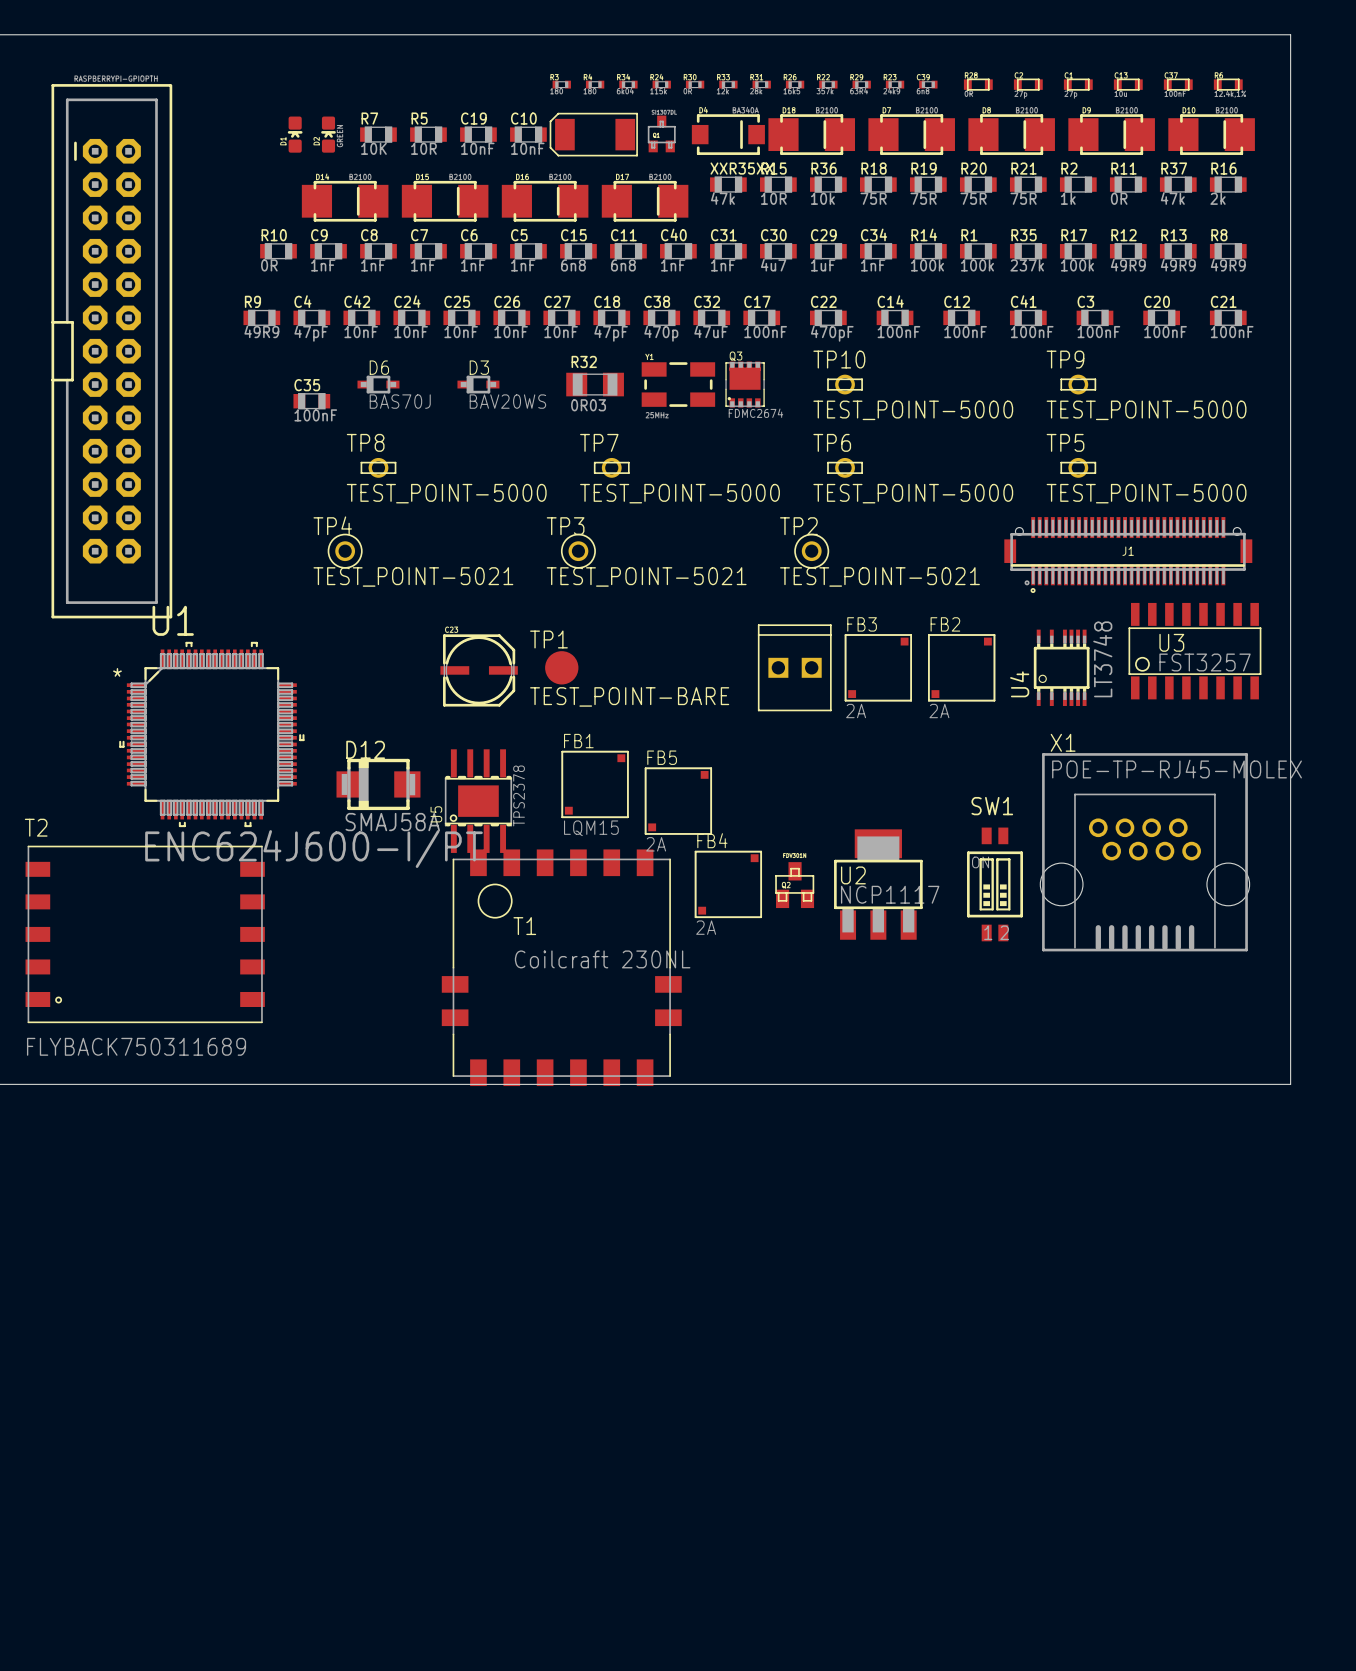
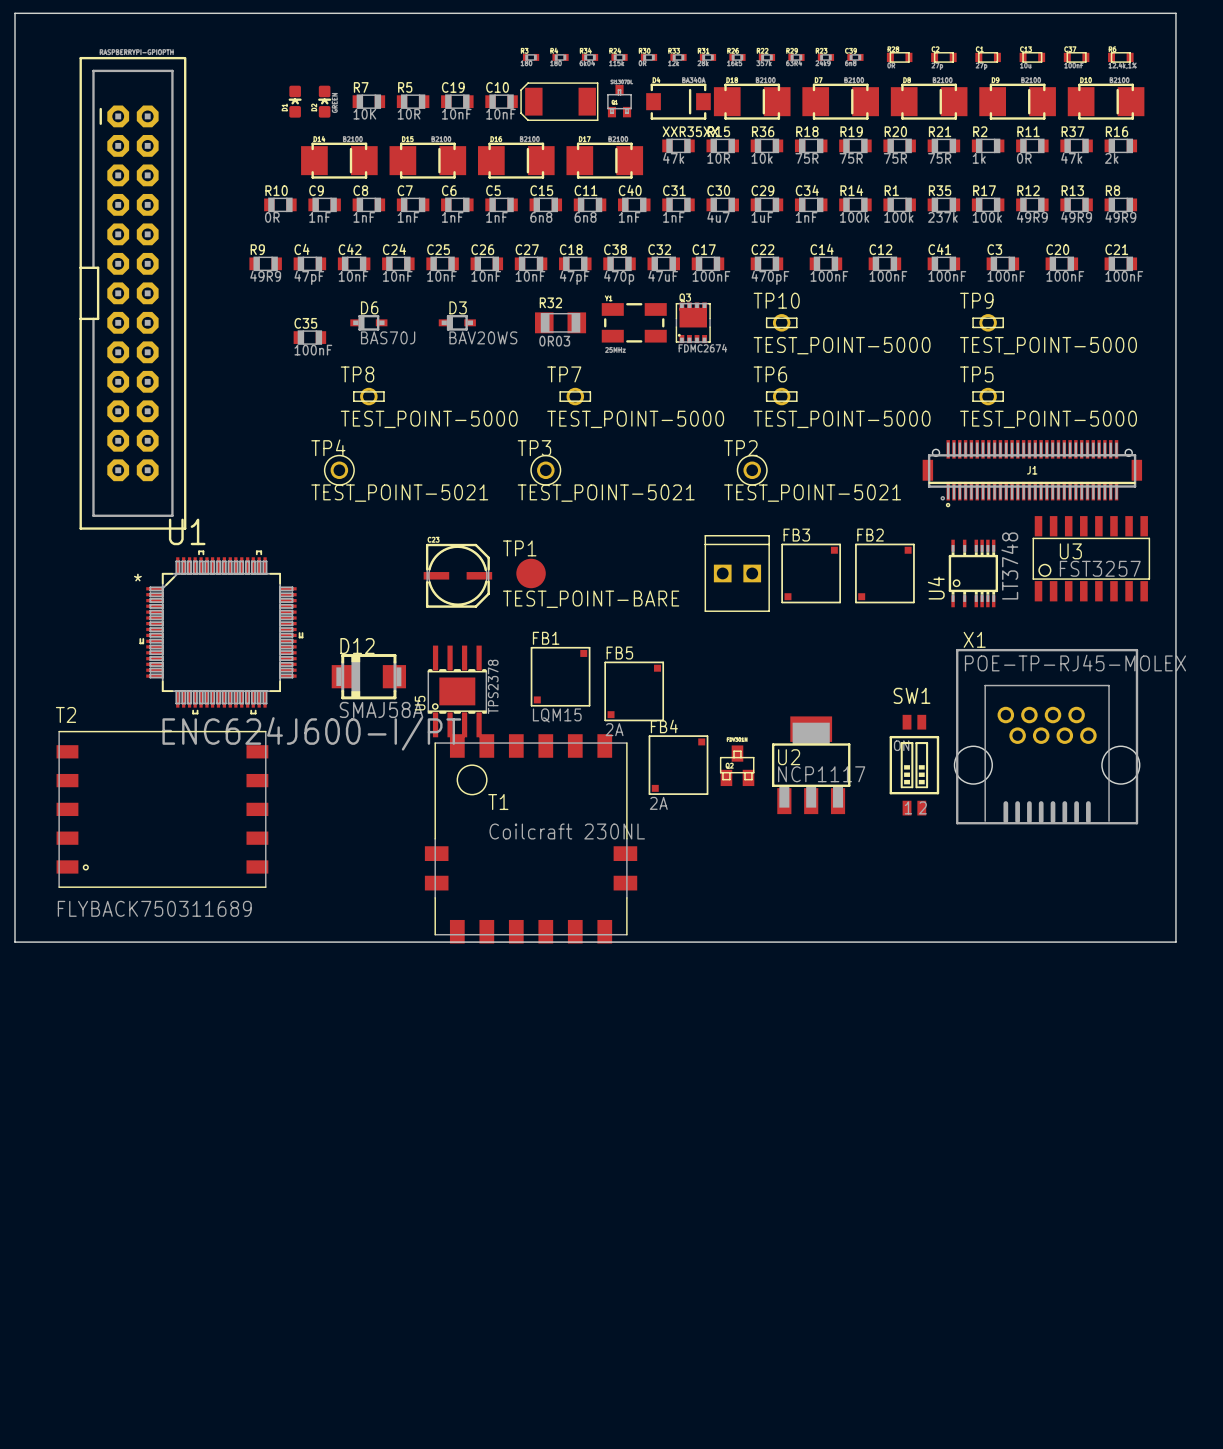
FB3 value: 2A (856, 711) -> none
FB2 value: 2A (939, 711) -> none

